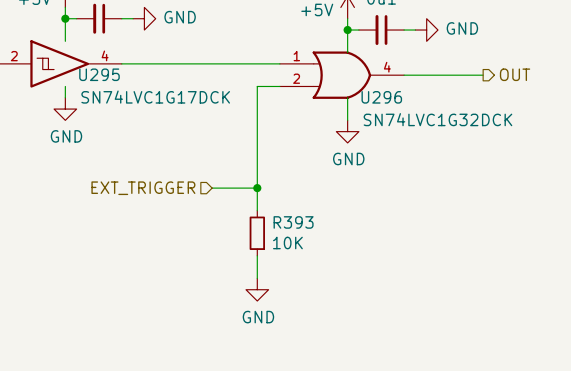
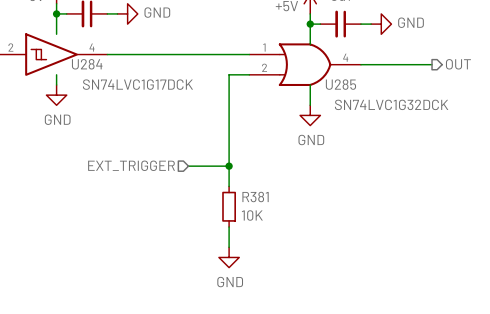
U295 name: U295 (99, 74) -> U284 (87, 64)
U296 name: U296 (381, 97) -> U285 (340, 84)
R393 name: R393 (293, 222) -> R381 (255, 197)

